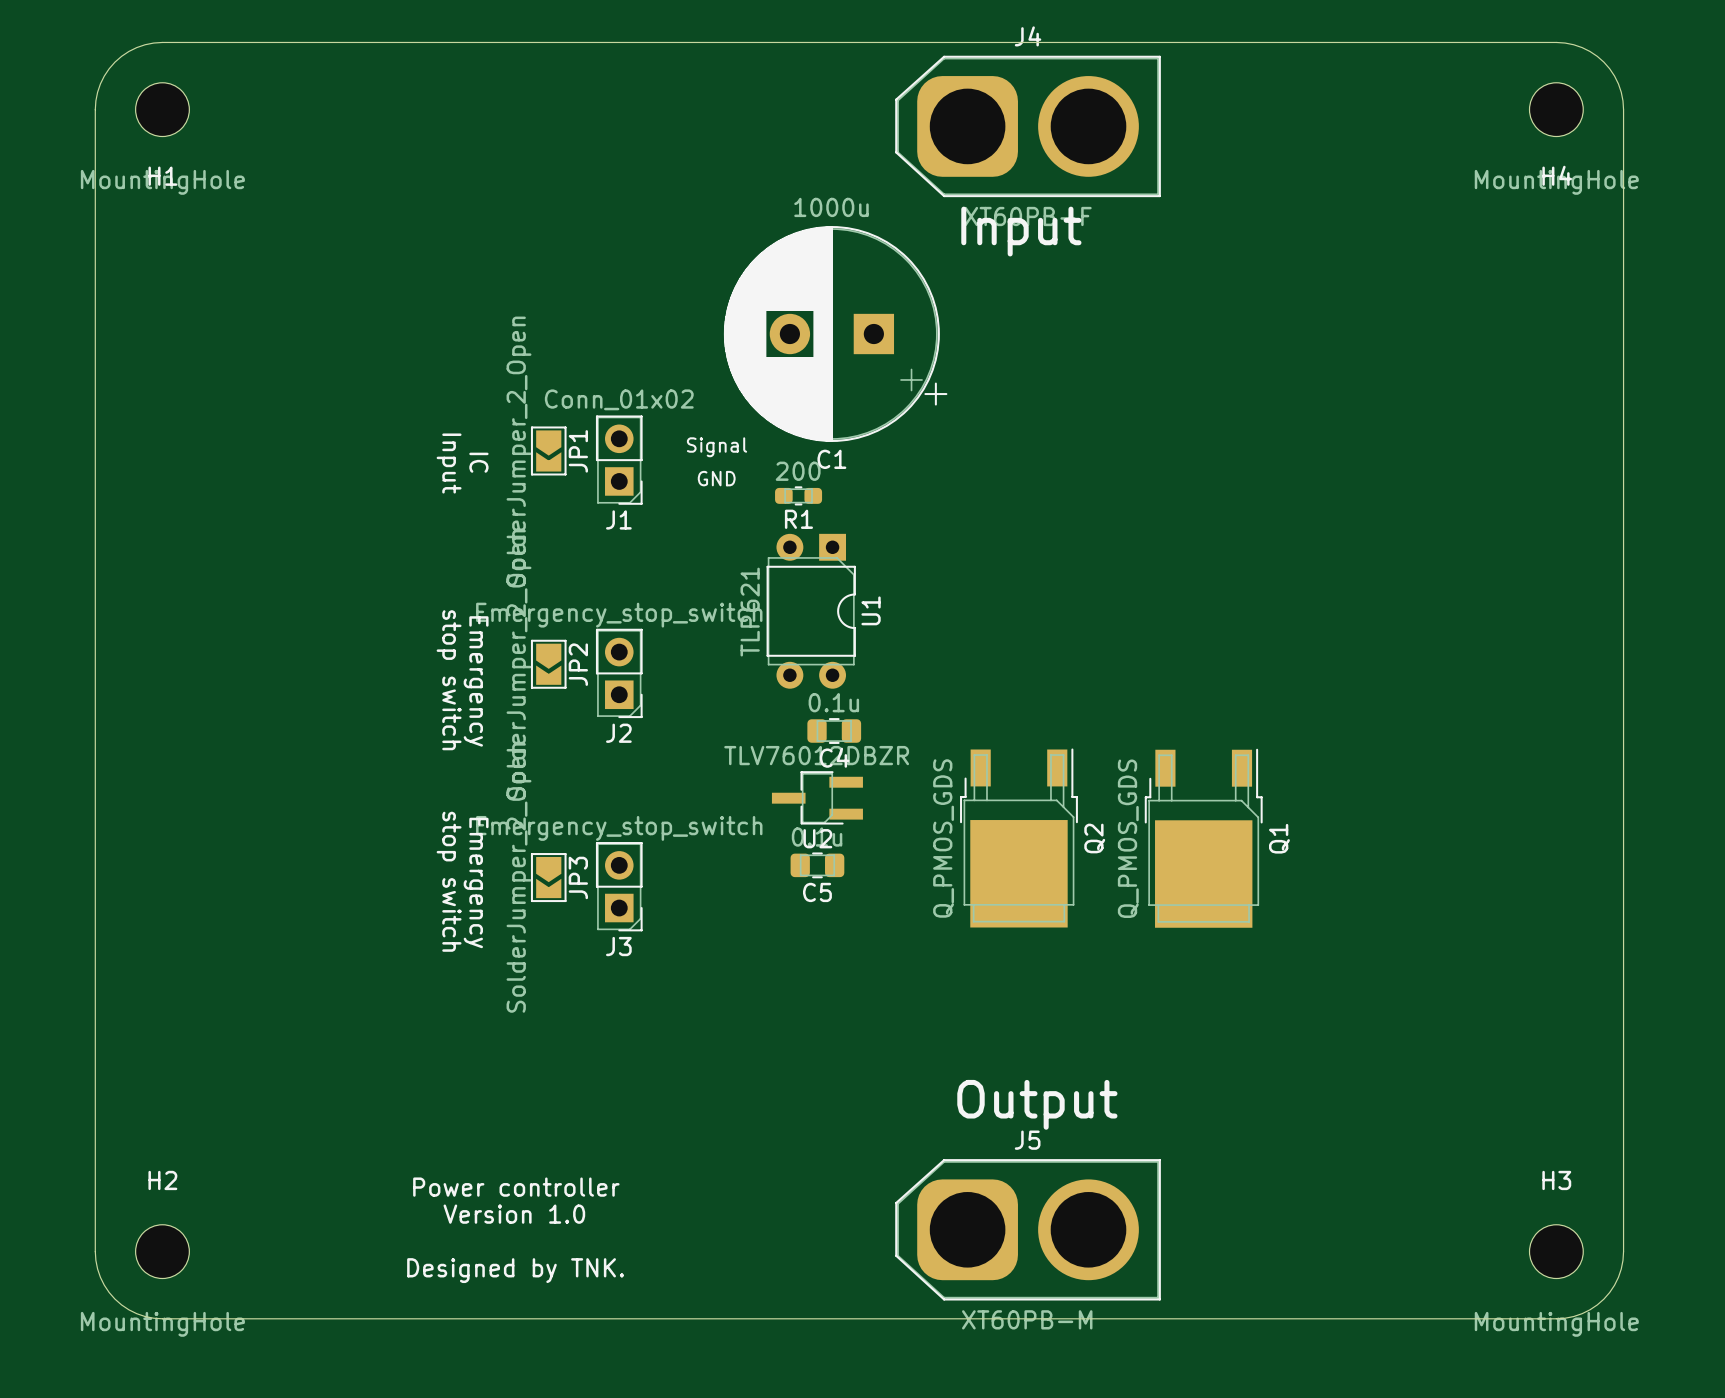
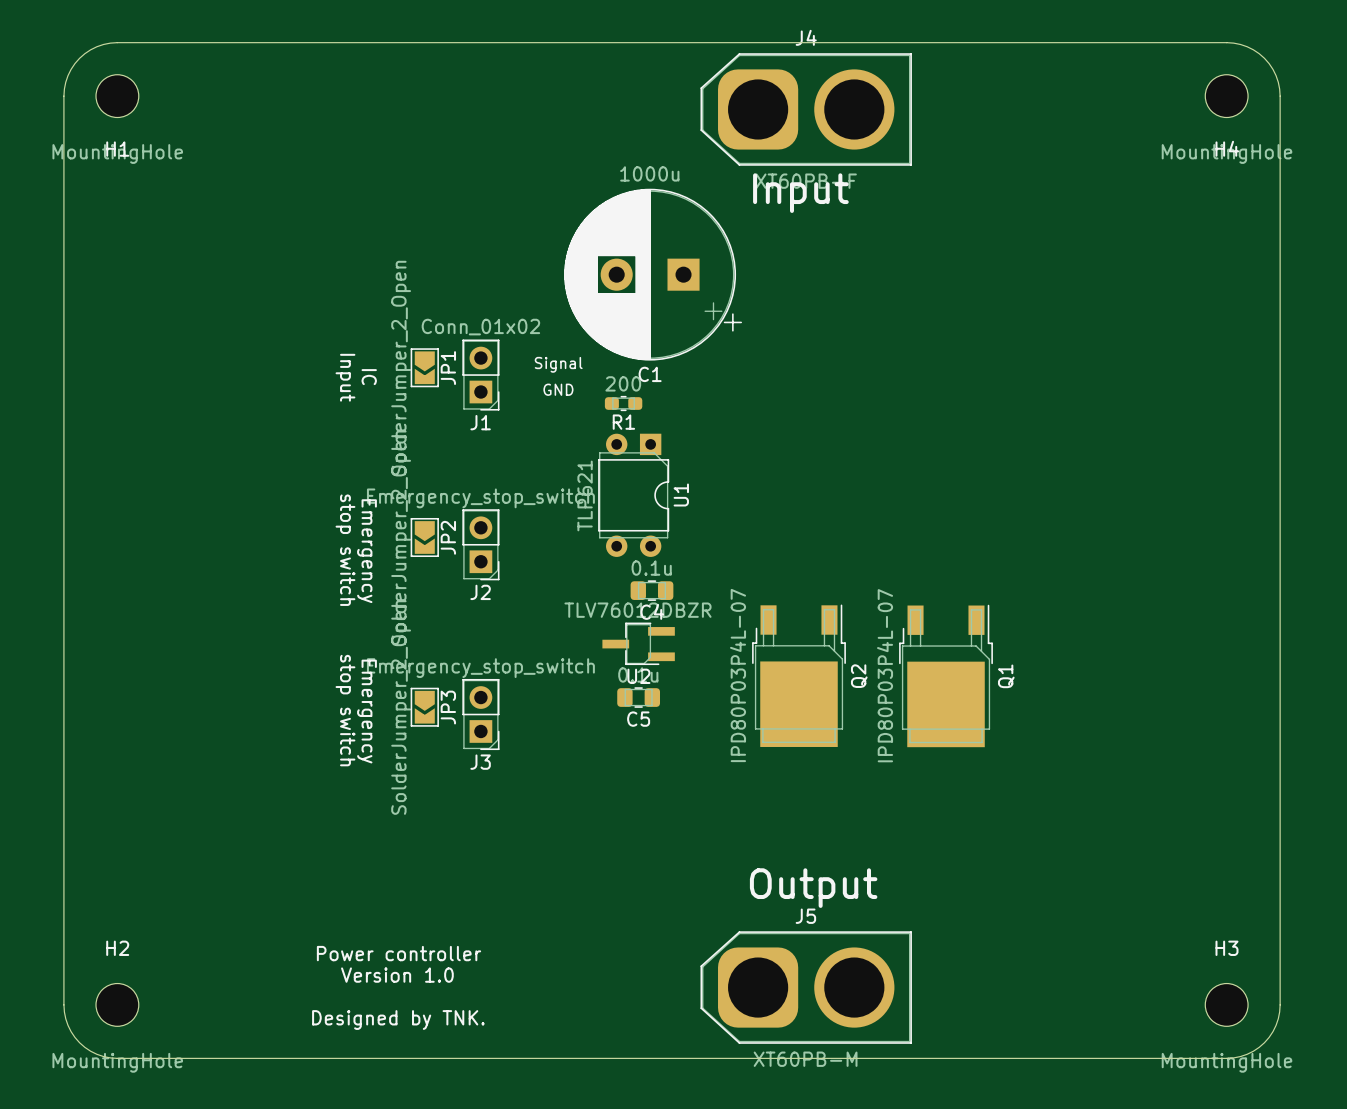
Q2 value: Q_PMOS_GDS (943, 838) -> IPD80P03P4L-07 (738, 675)
Q1 value: Q_PMOS_GDS (1128, 838) -> IPD80P03P4L-07 (885, 675)

